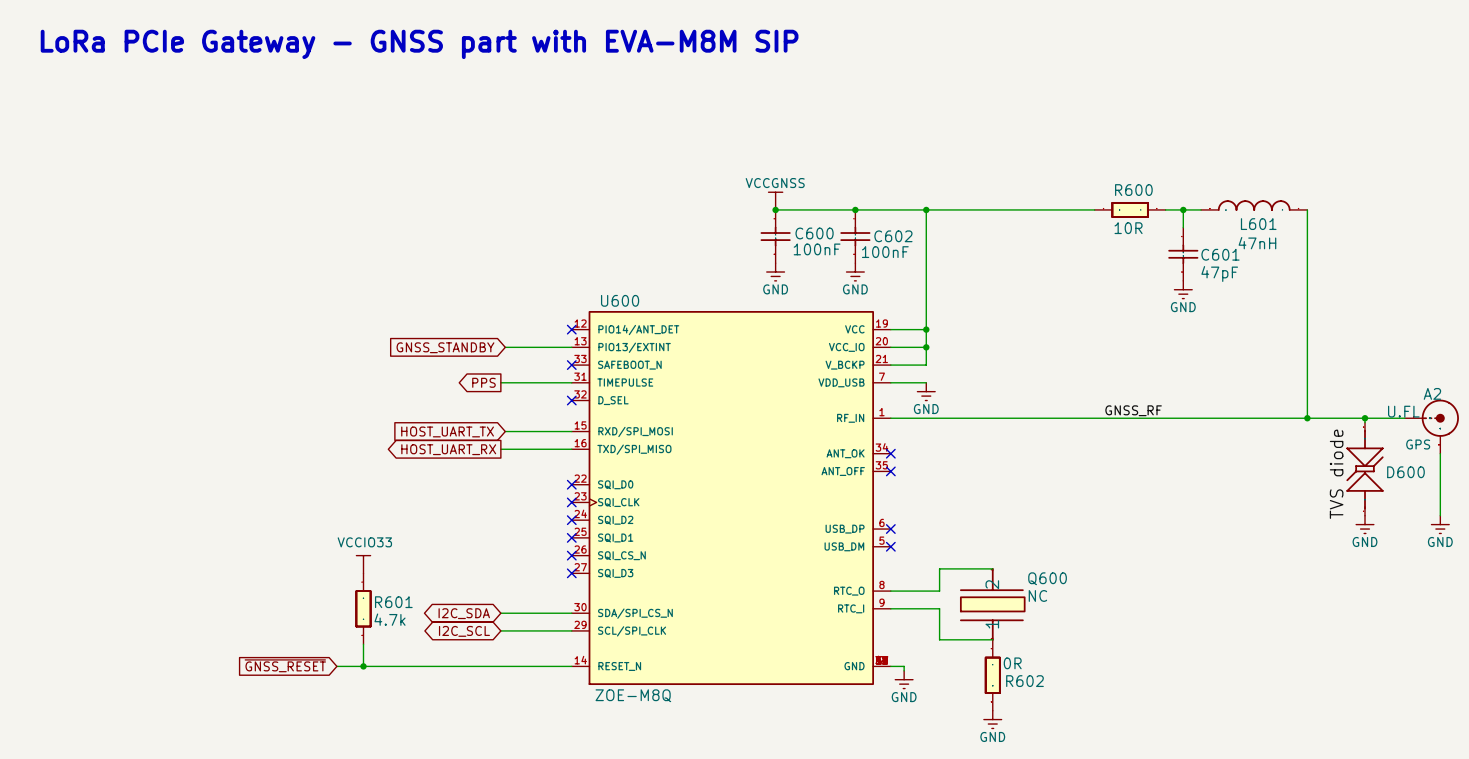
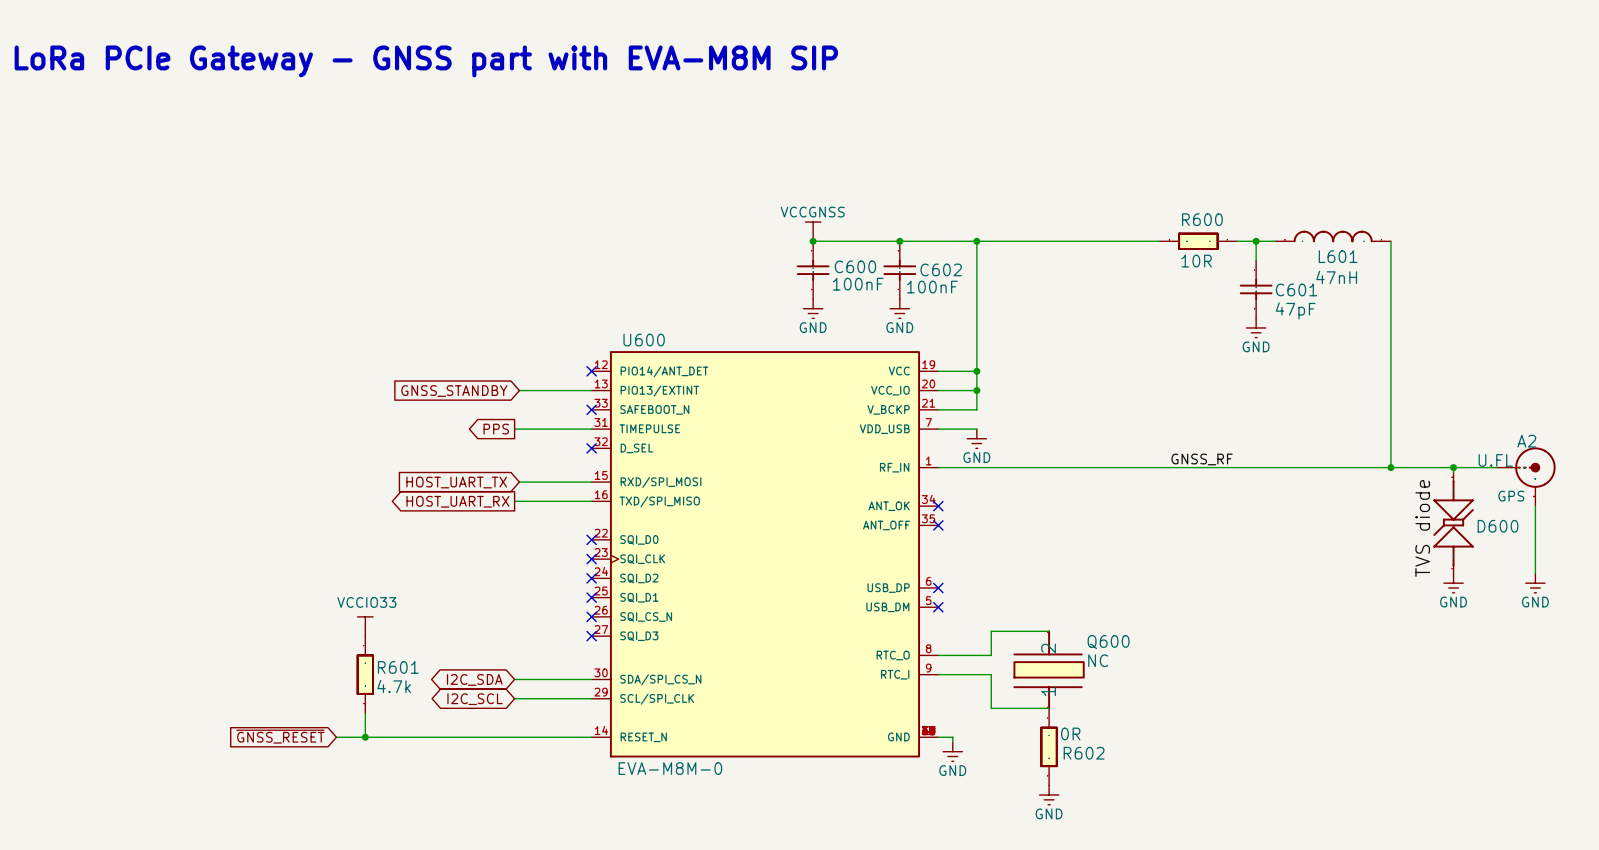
U600 value: ZOE-M8Q (633, 695) -> EVA-M8M-0 (670, 768)

